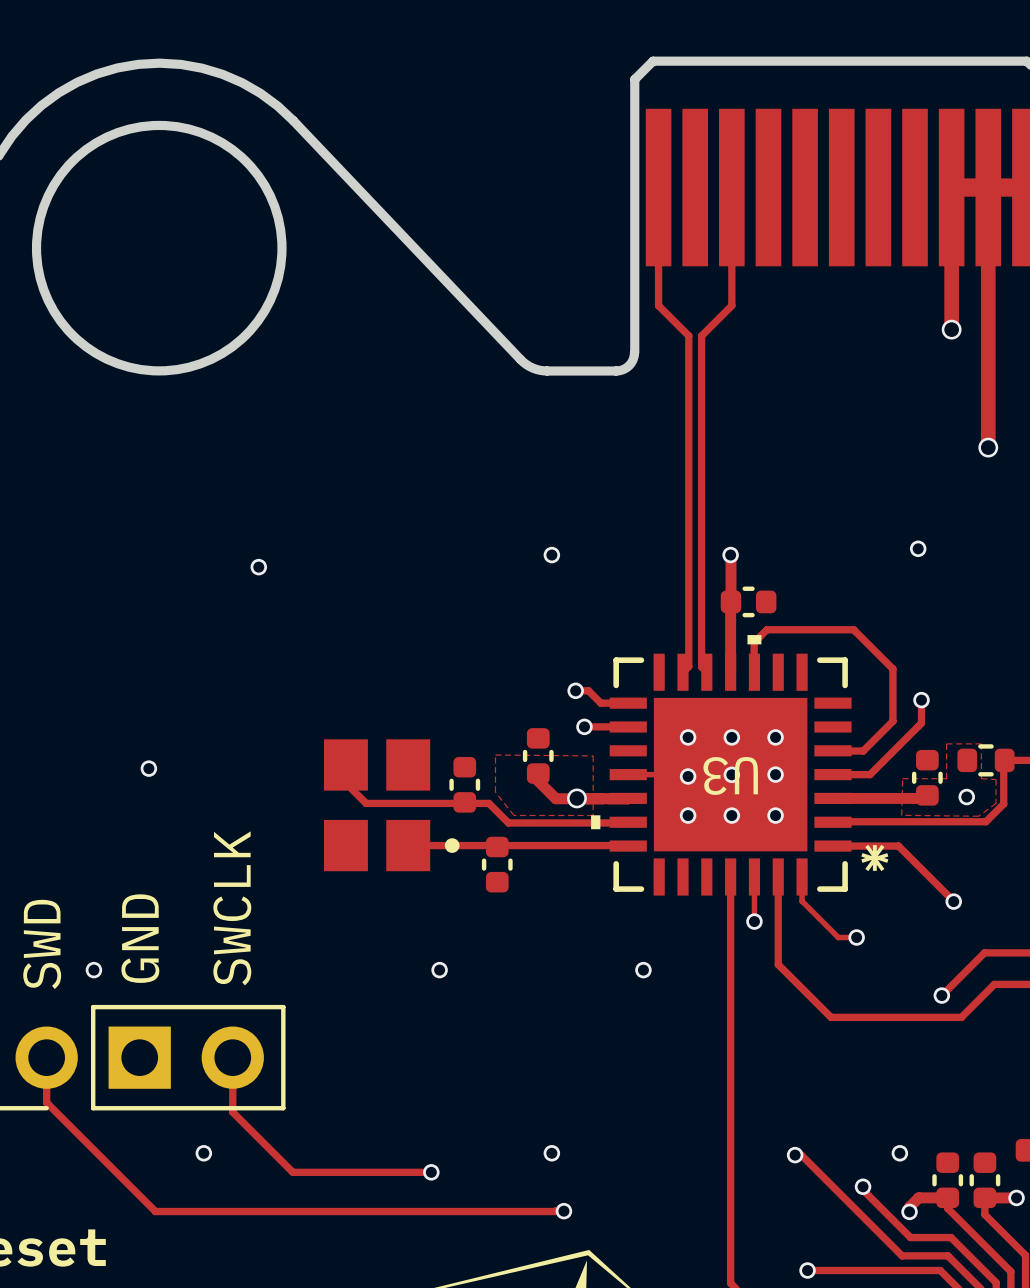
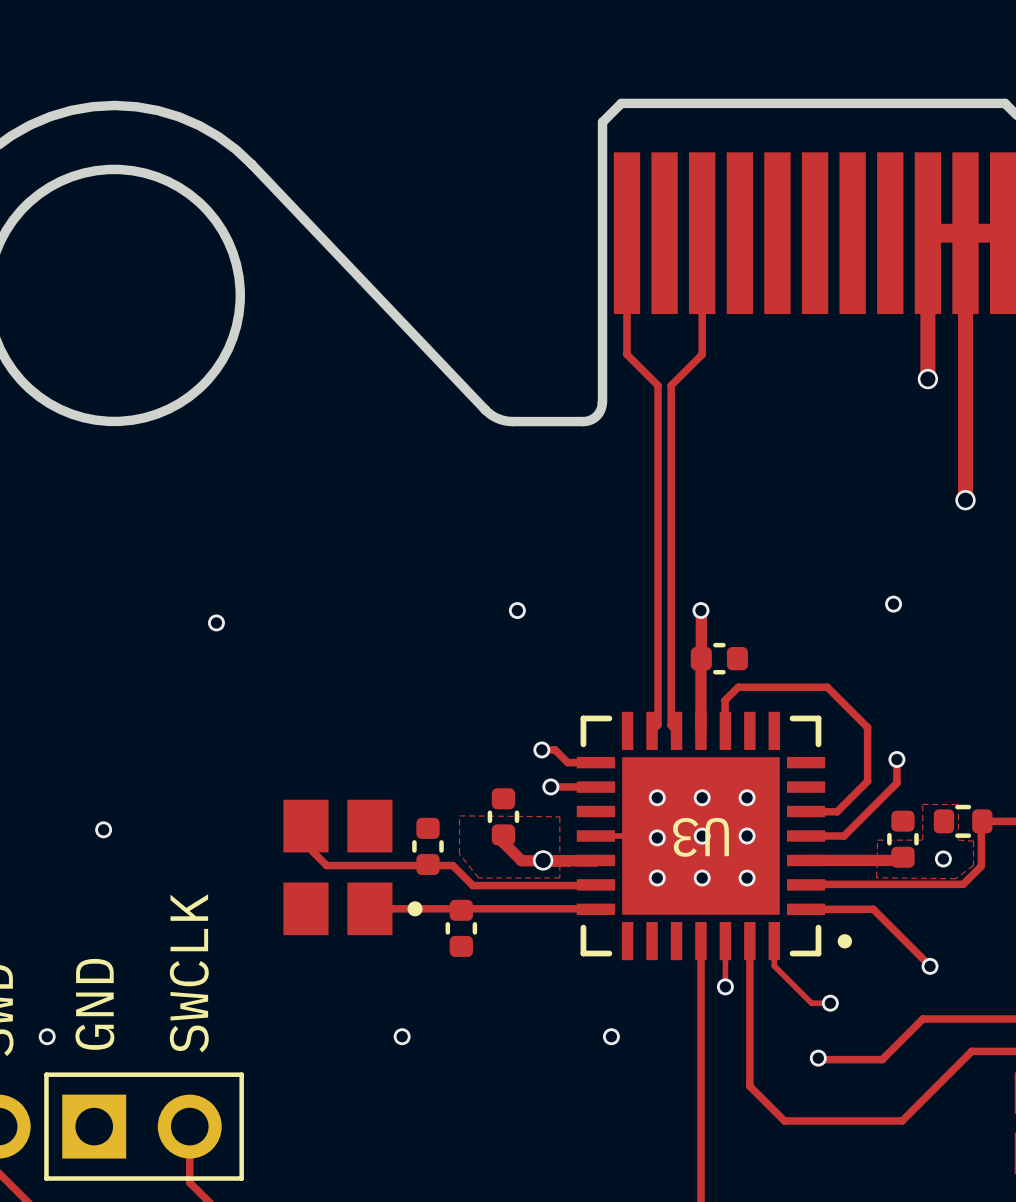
U3 footprint: [591, 635, 852, 896] -> [576, 711, 852, 961]
track: (984, 952) (941, 995) -> (961, 1019) (922, 1019) (882, 1059) (818, 1058)
track: (778, 964) (831, 1017) (961, 1017) -> (749, 1031) (749, 1086) (784, 1120) (902, 1120) (937, 1085)
via position: (941, 995) -> (818, 1058)

